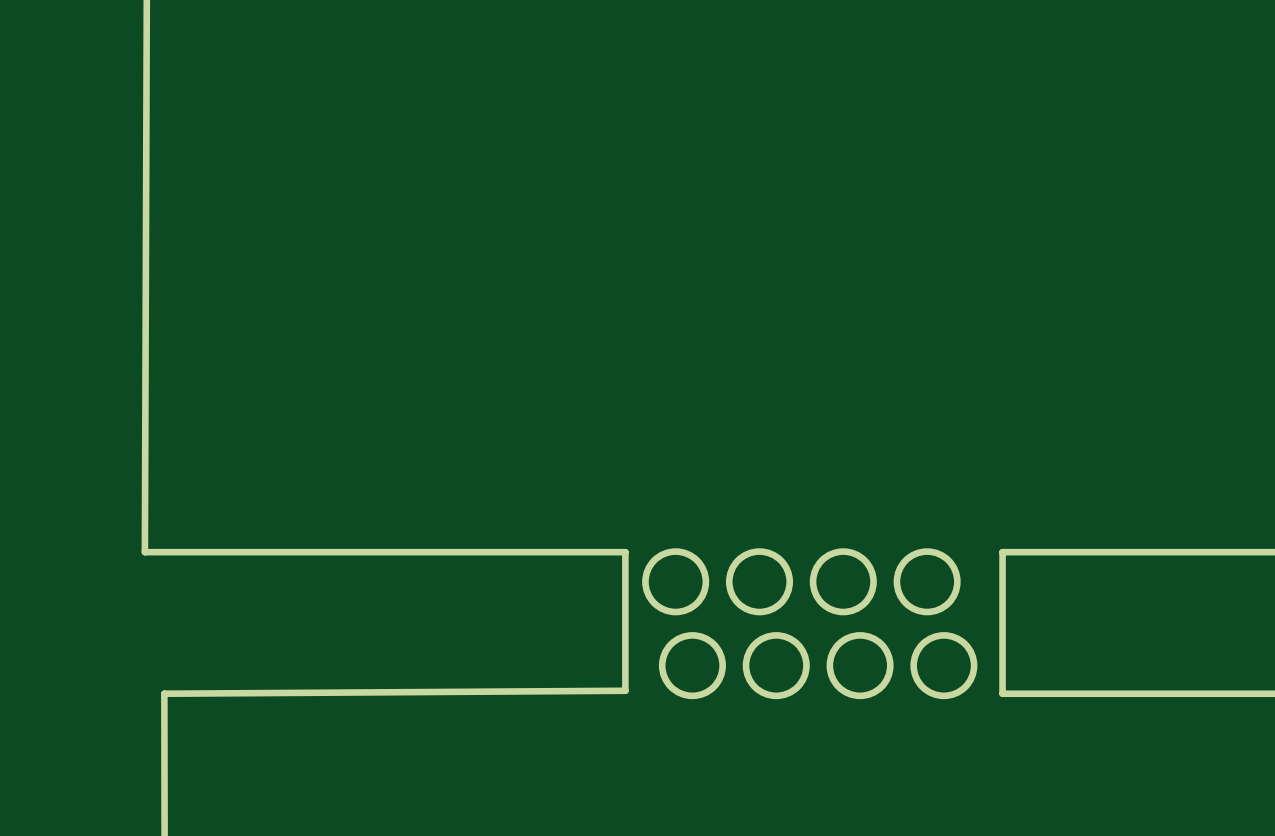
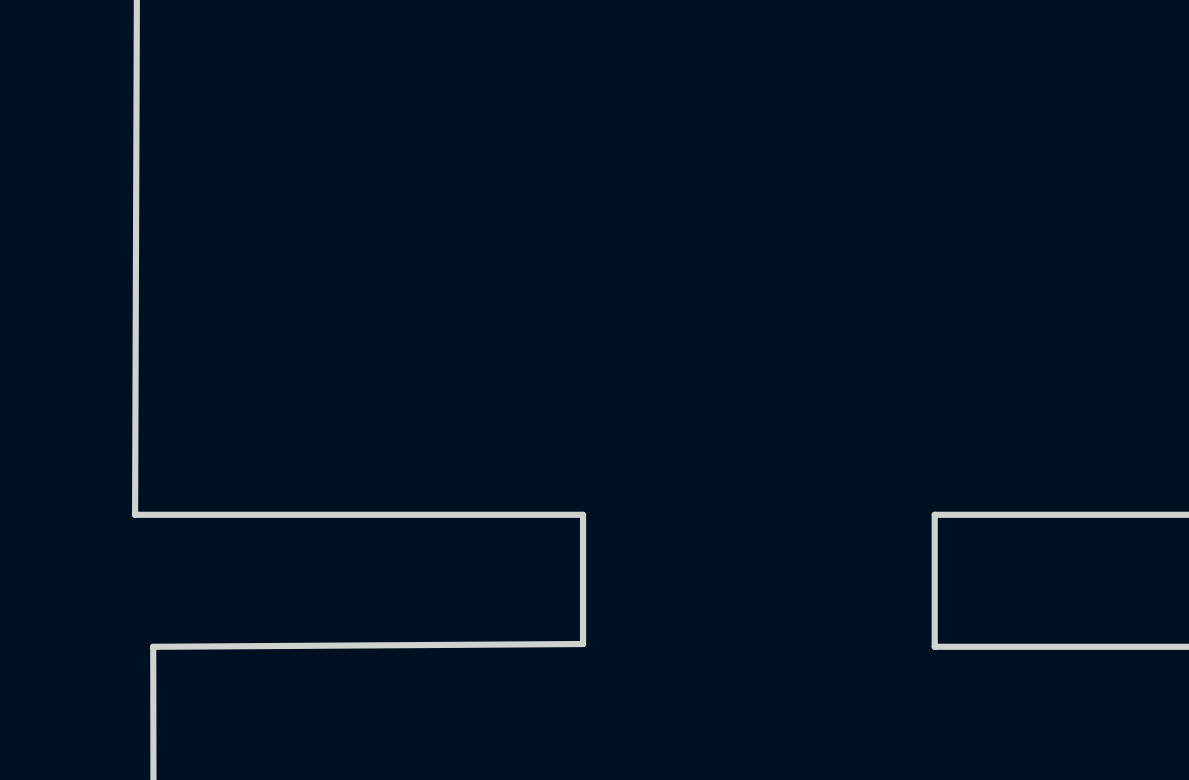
round board edge: [642, 548, 710, 616] -> none
round board edge: [725, 548, 794, 616] -> none
round board edge: [809, 548, 877, 616] -> none
round board edge: [893, 548, 961, 616] -> none
round board edge: [658, 632, 726, 700] -> none
round board edge: [742, 632, 810, 700] -> none
round board edge: [826, 632, 894, 700] -> none
round board edge: [910, 632, 978, 700] -> none

